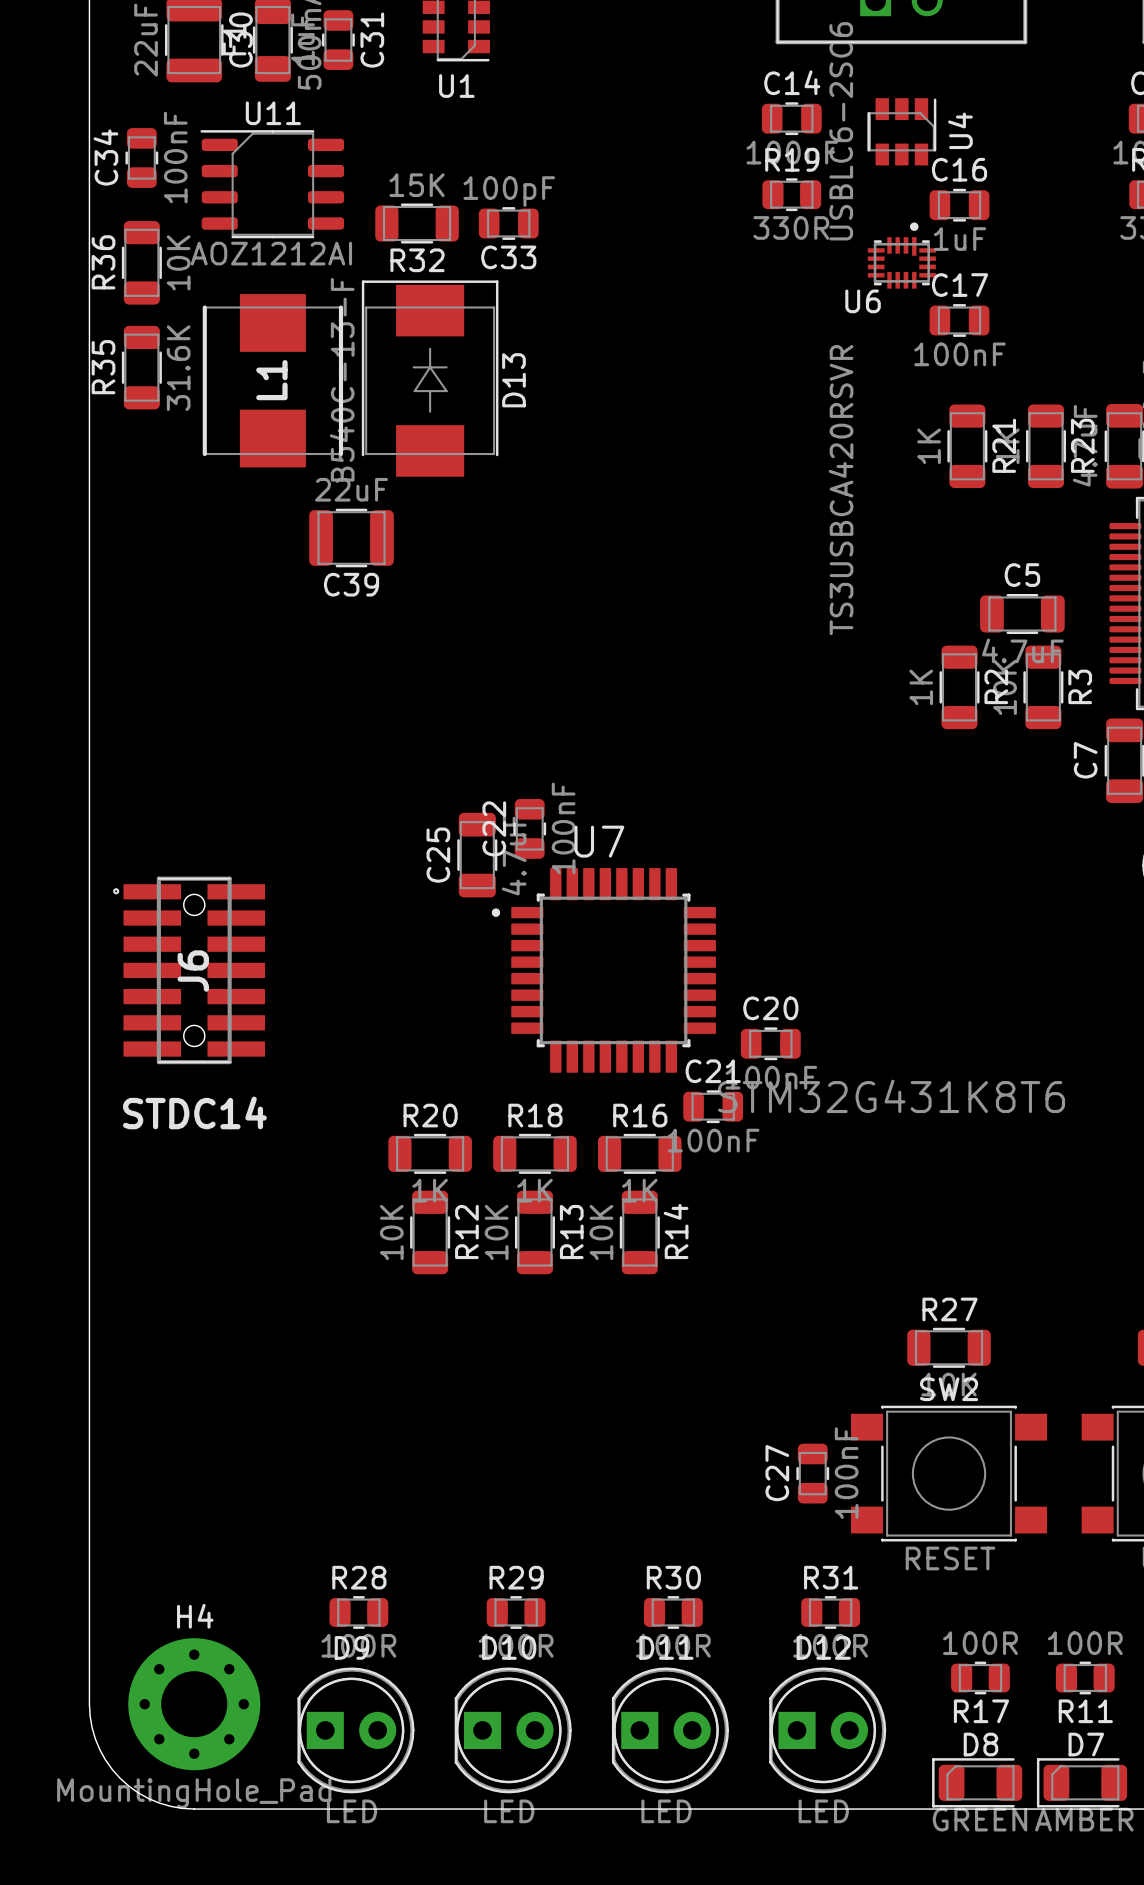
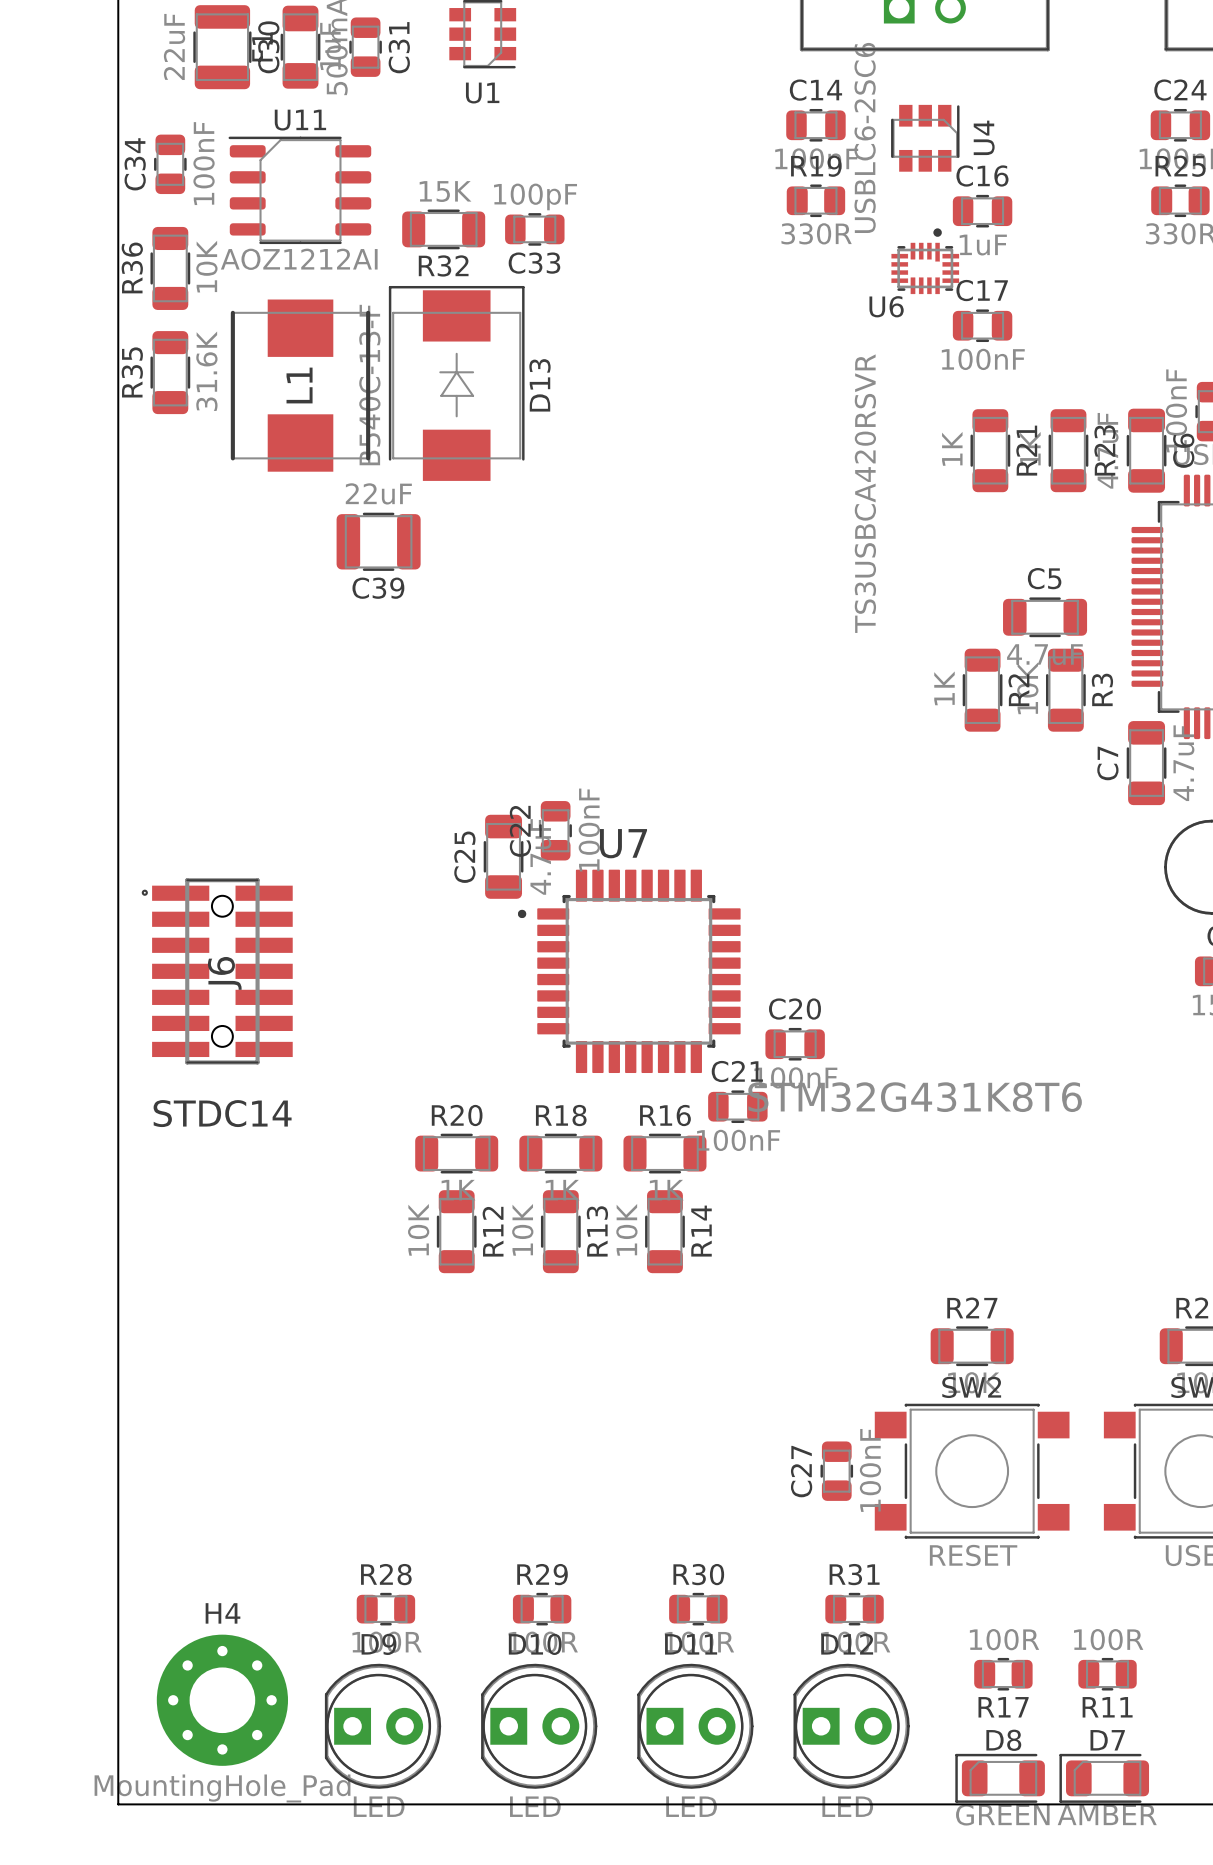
board edge: (89, 1704) (92, 1727) (99, 1749) (120, 1778) (148, 1798) (170, 1806) (194, 1809) -> (118, 1700) (118, 1804) (222, 1804)

